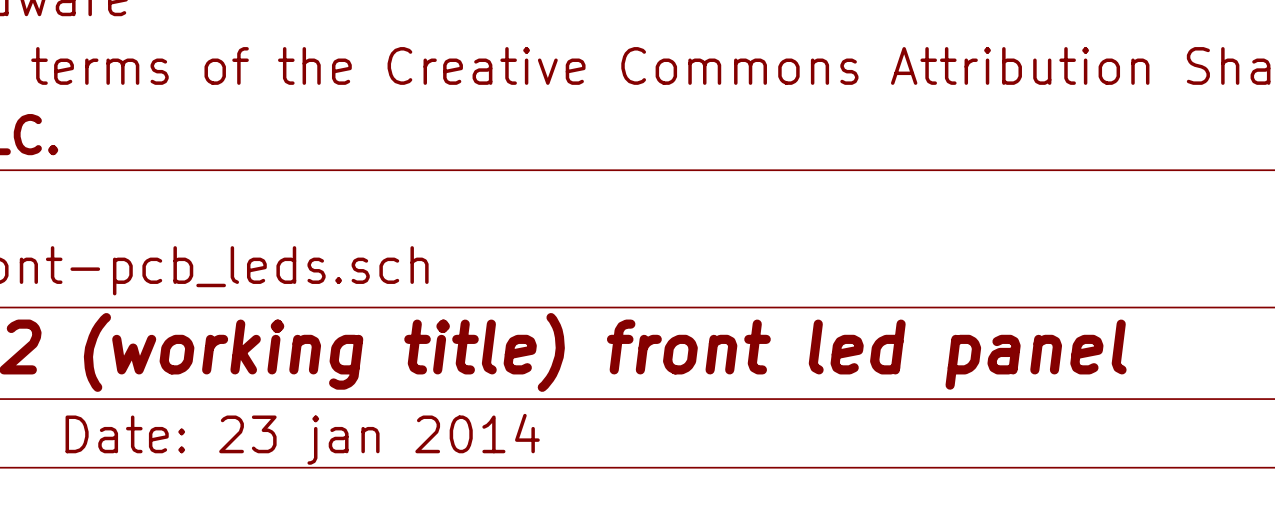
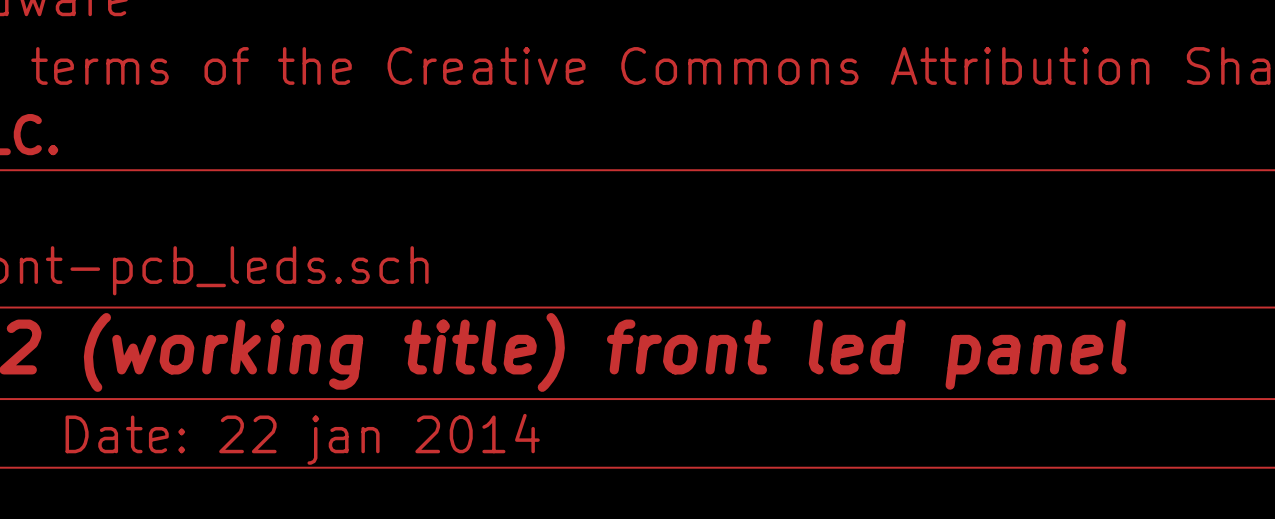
title block: Date: 23 jan 2014 (302, 439) -> Date: 22 jan 2014 (302, 439)

